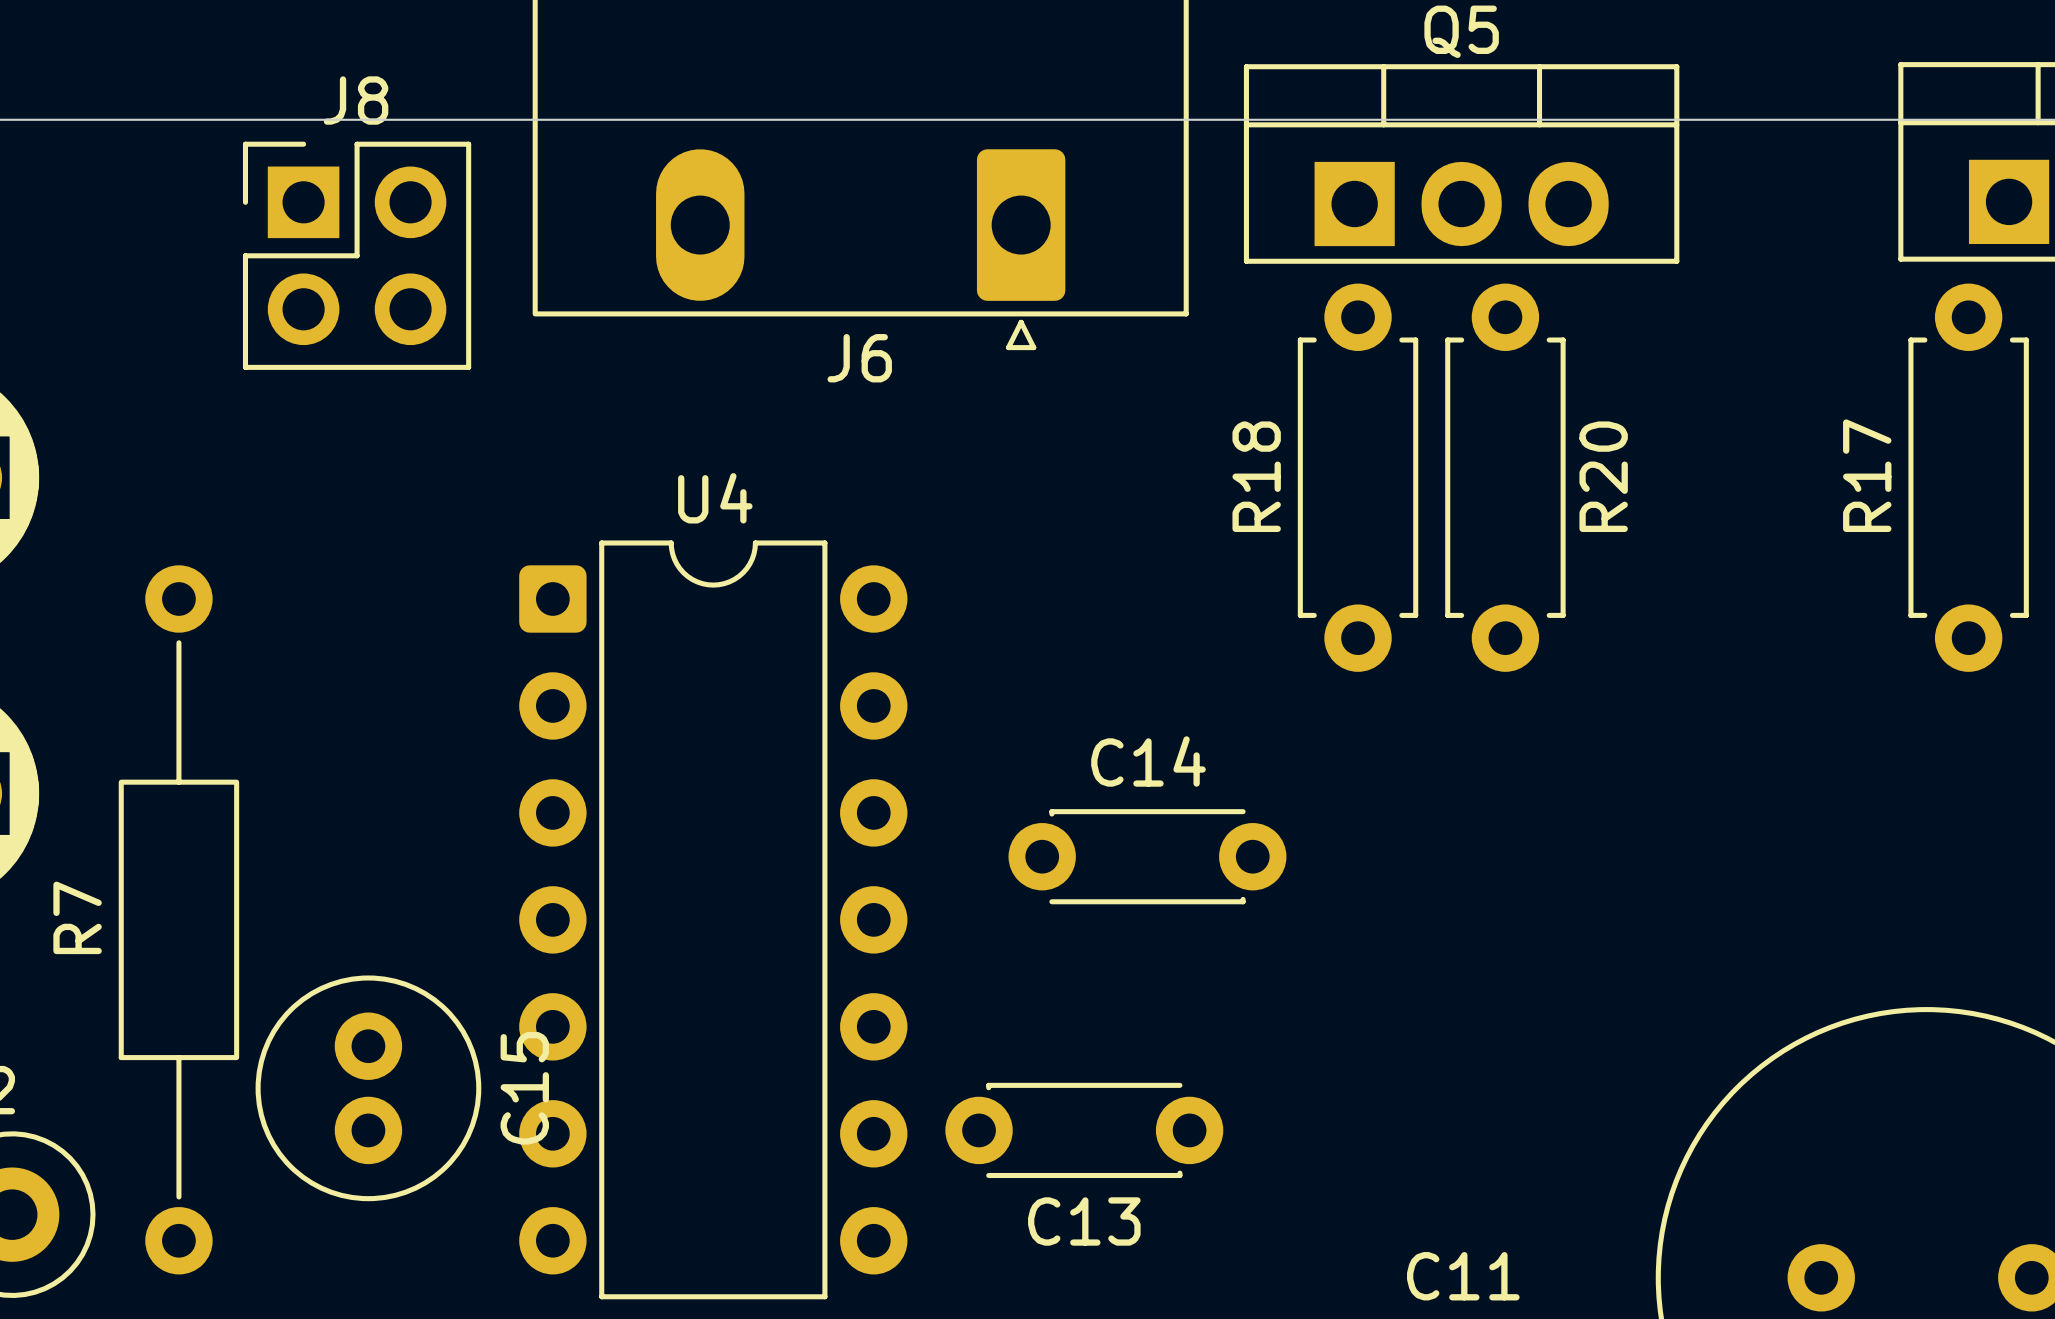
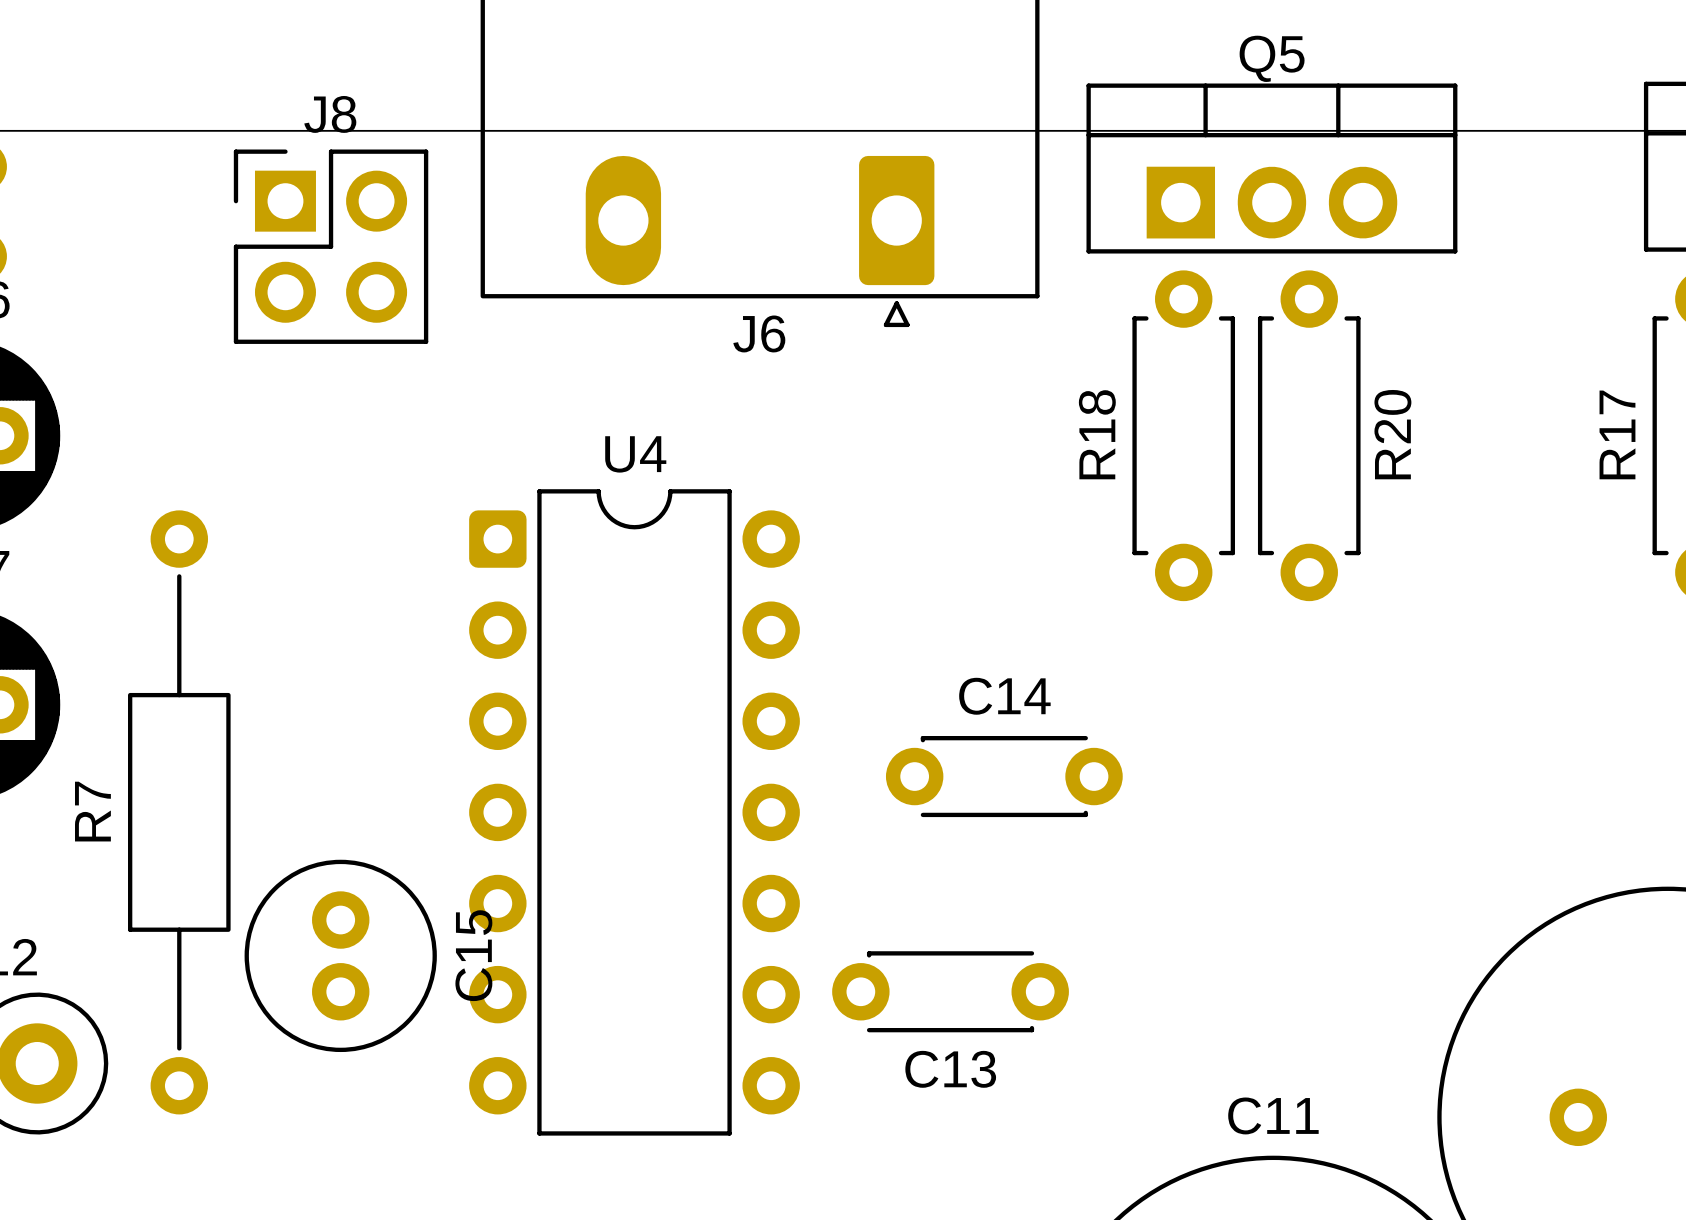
C14 position: (1147, 856) -> (1004, 776)

